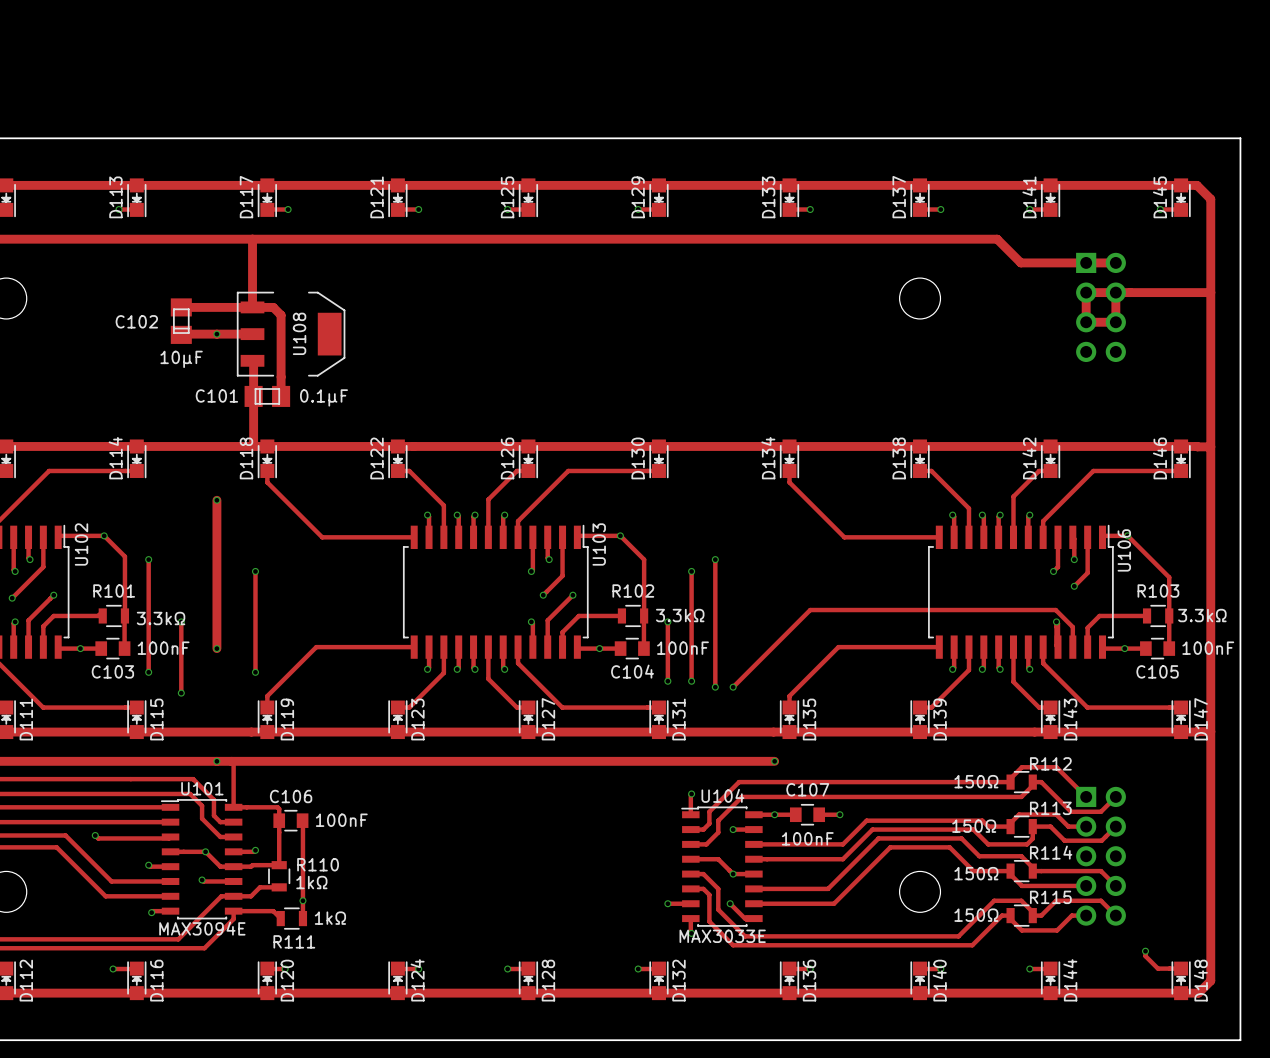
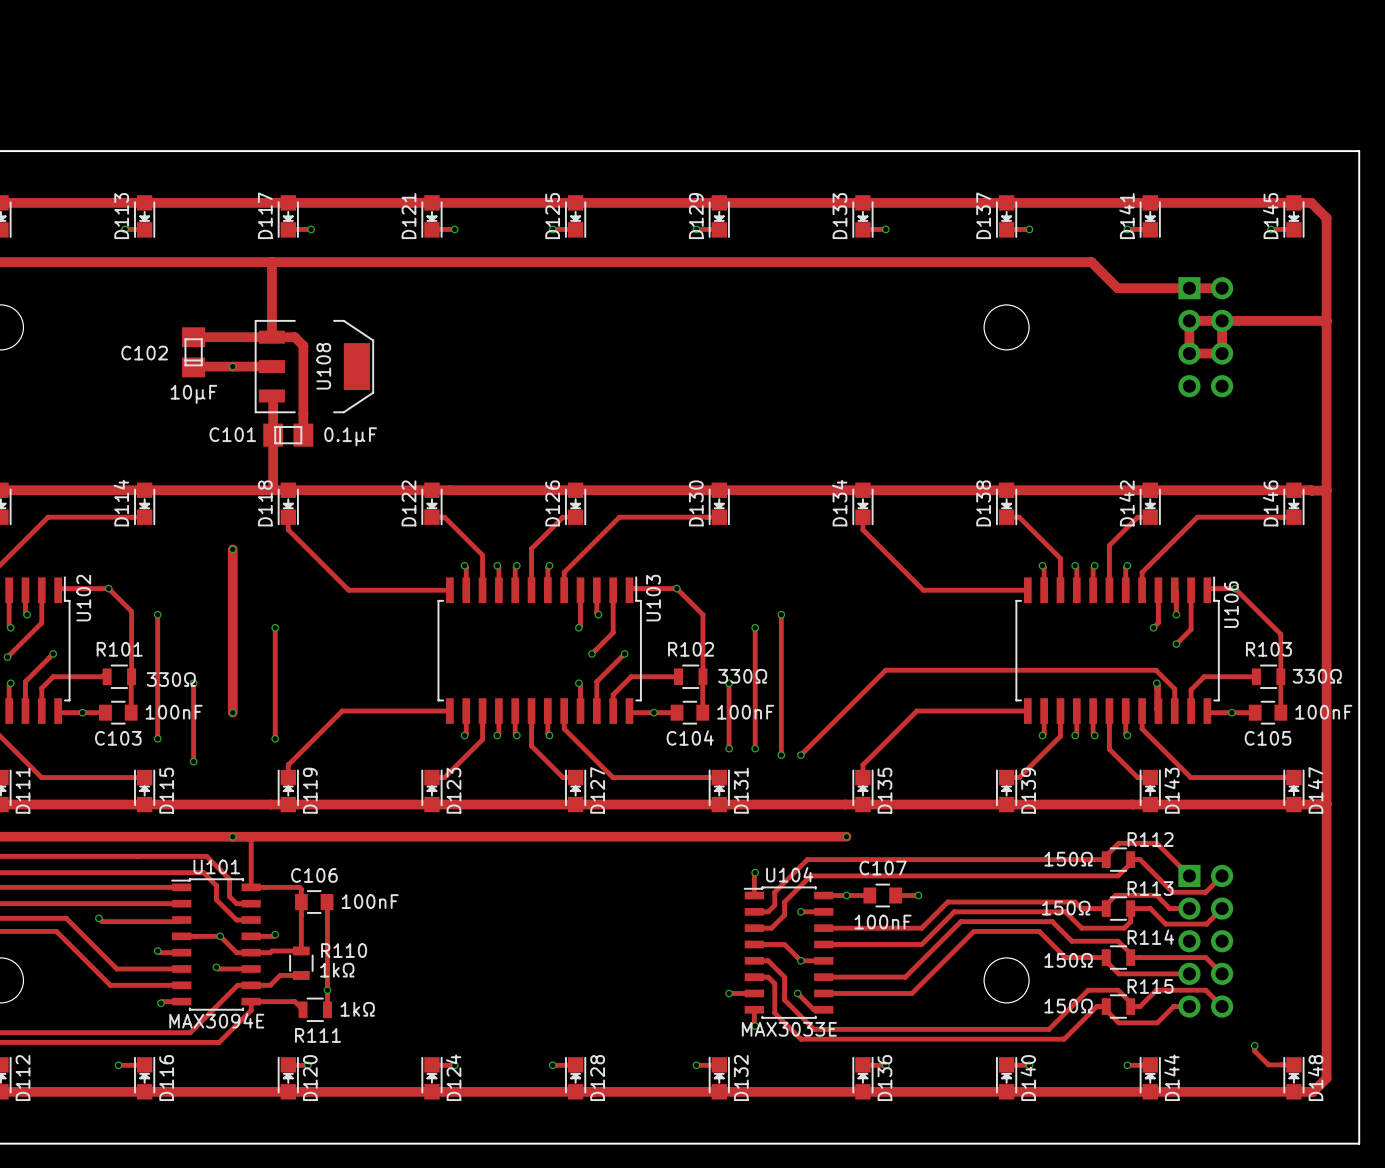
R102 value: 3.3kΩ (680, 615) -> 330Ω (742, 676)
R103 value: 3.3kΩ (1202, 615) -> 330Ω (1317, 676)
R101 value: 3.3kΩ (161, 618) -> 330Ω (171, 679)

